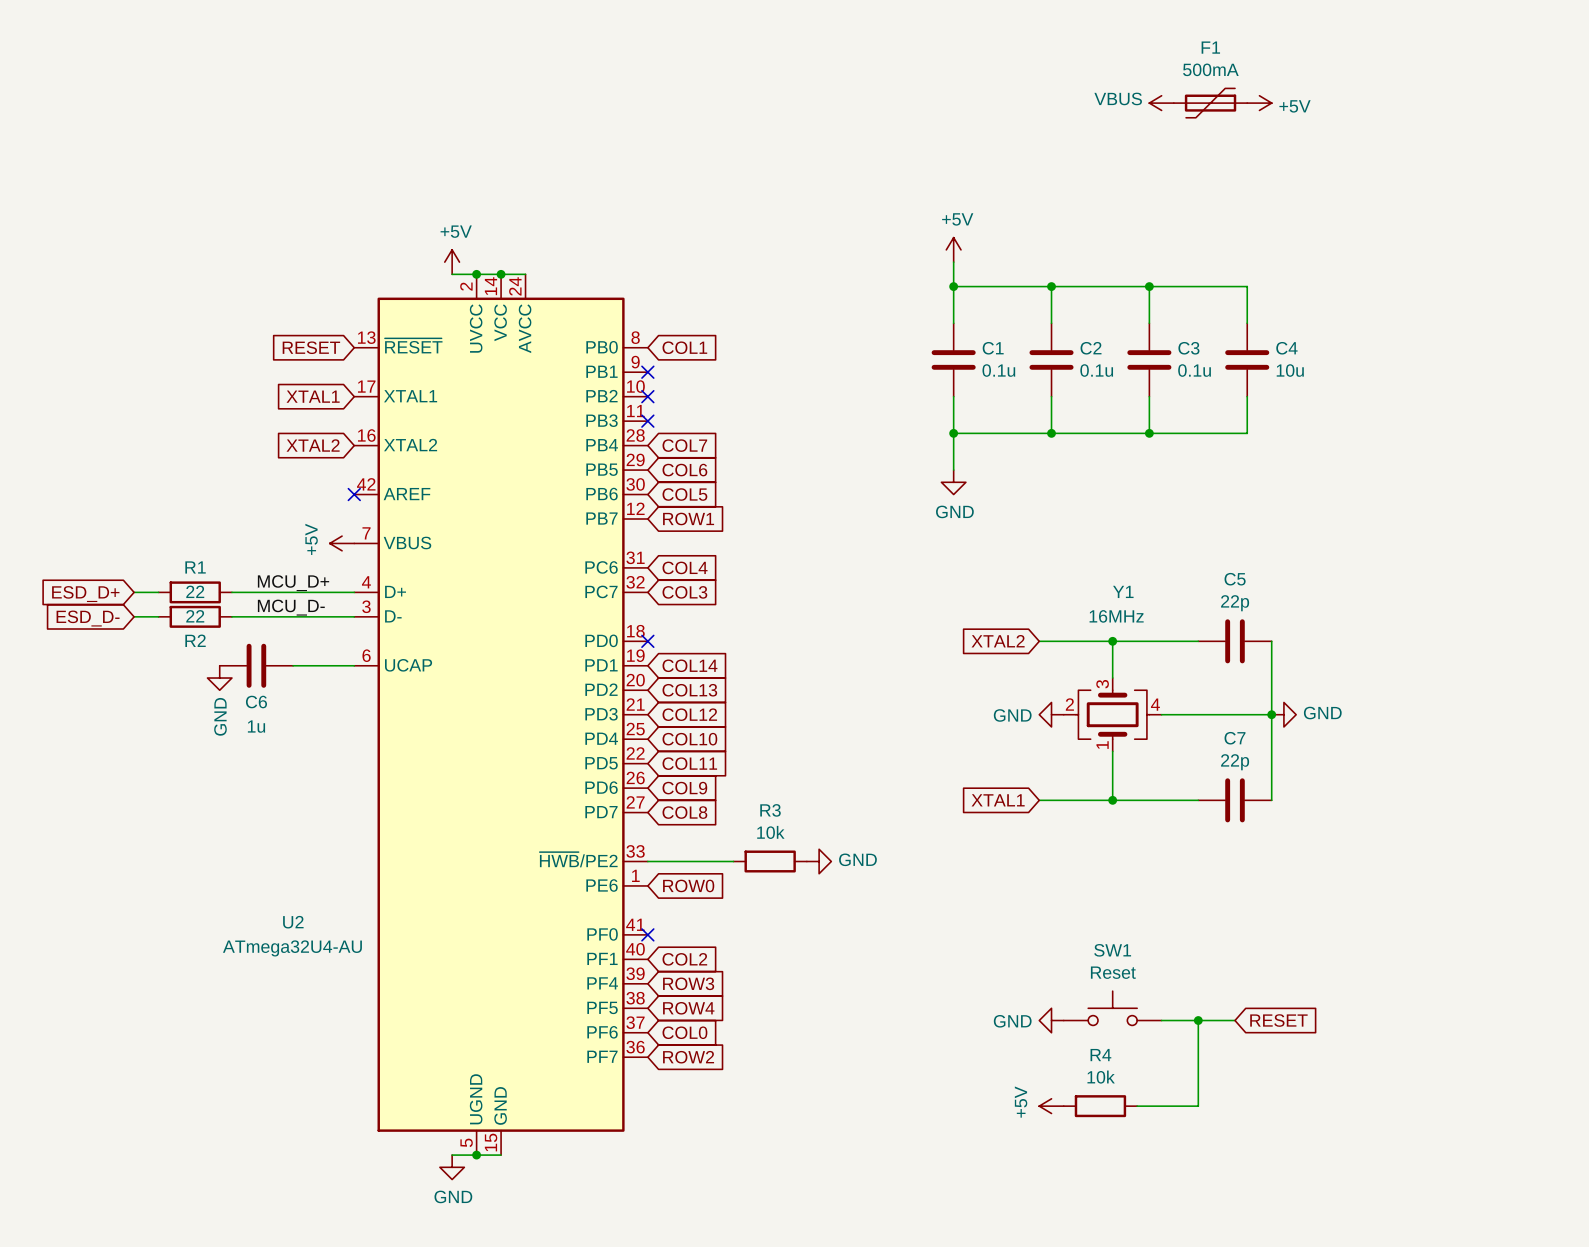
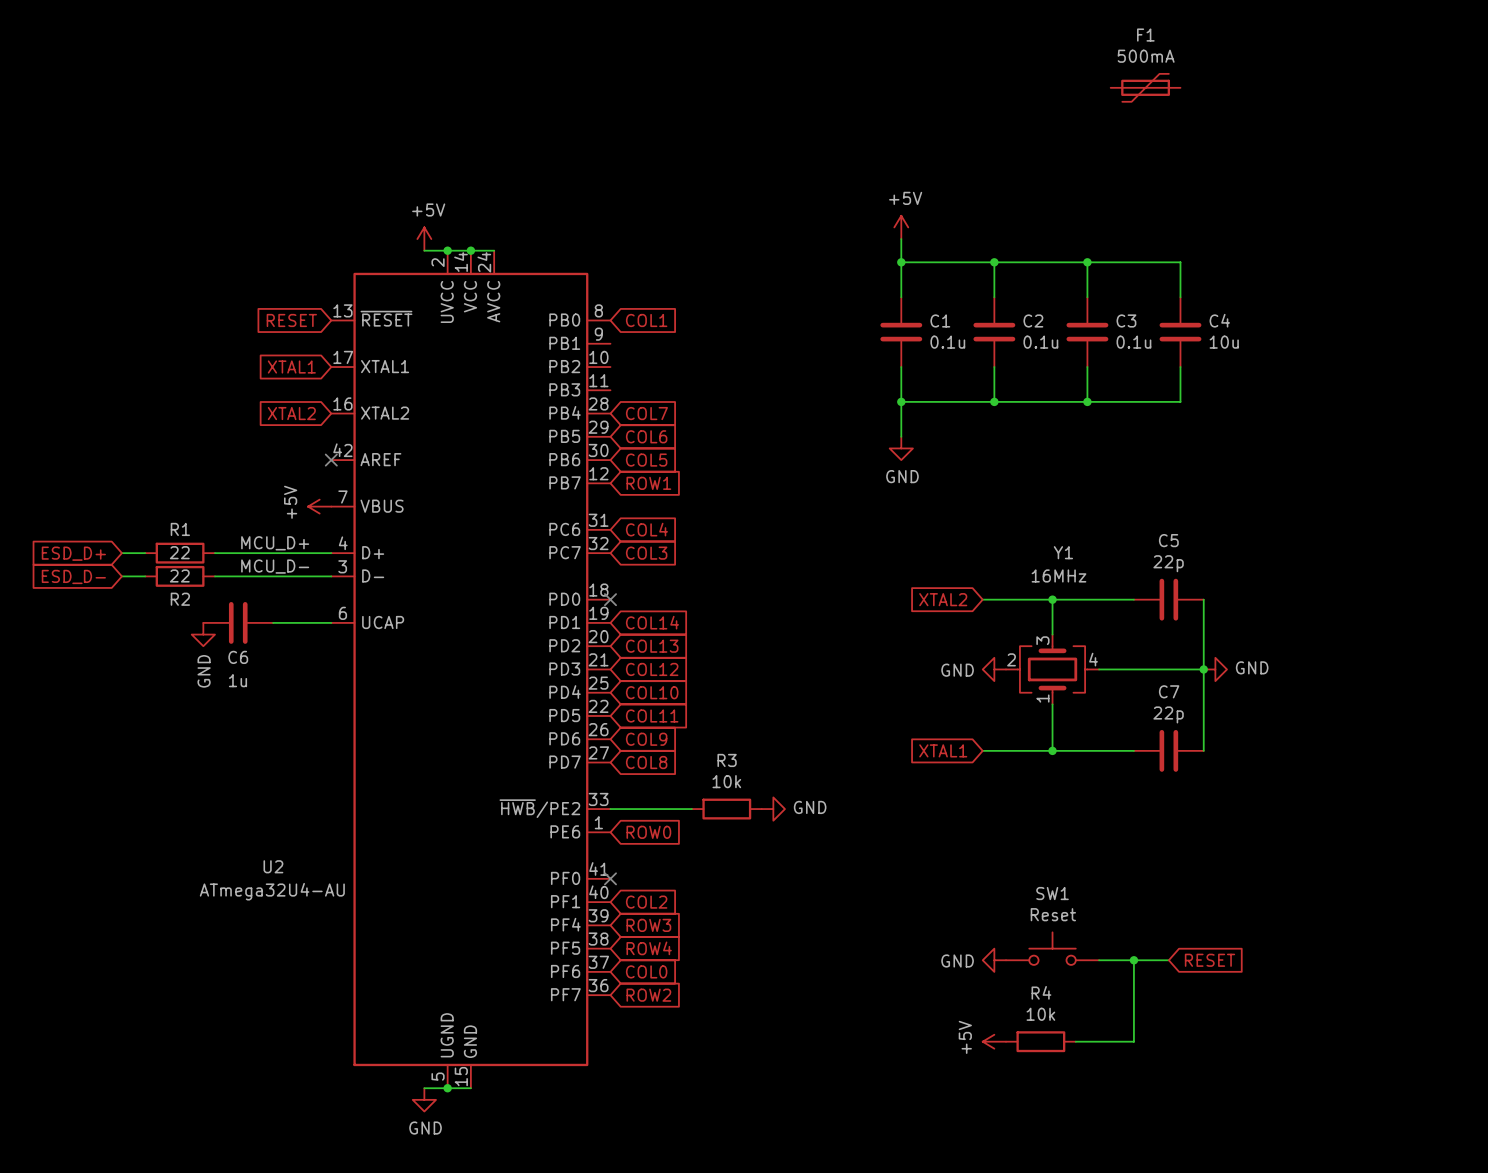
power symbol: VBUS (1161, 103) -> none
power symbol: +5V (1259, 103) -> none
no-connect mark: (647, 372) -> none
no-connect mark: (647, 396) -> none
no-connect mark: (647, 421) -> none

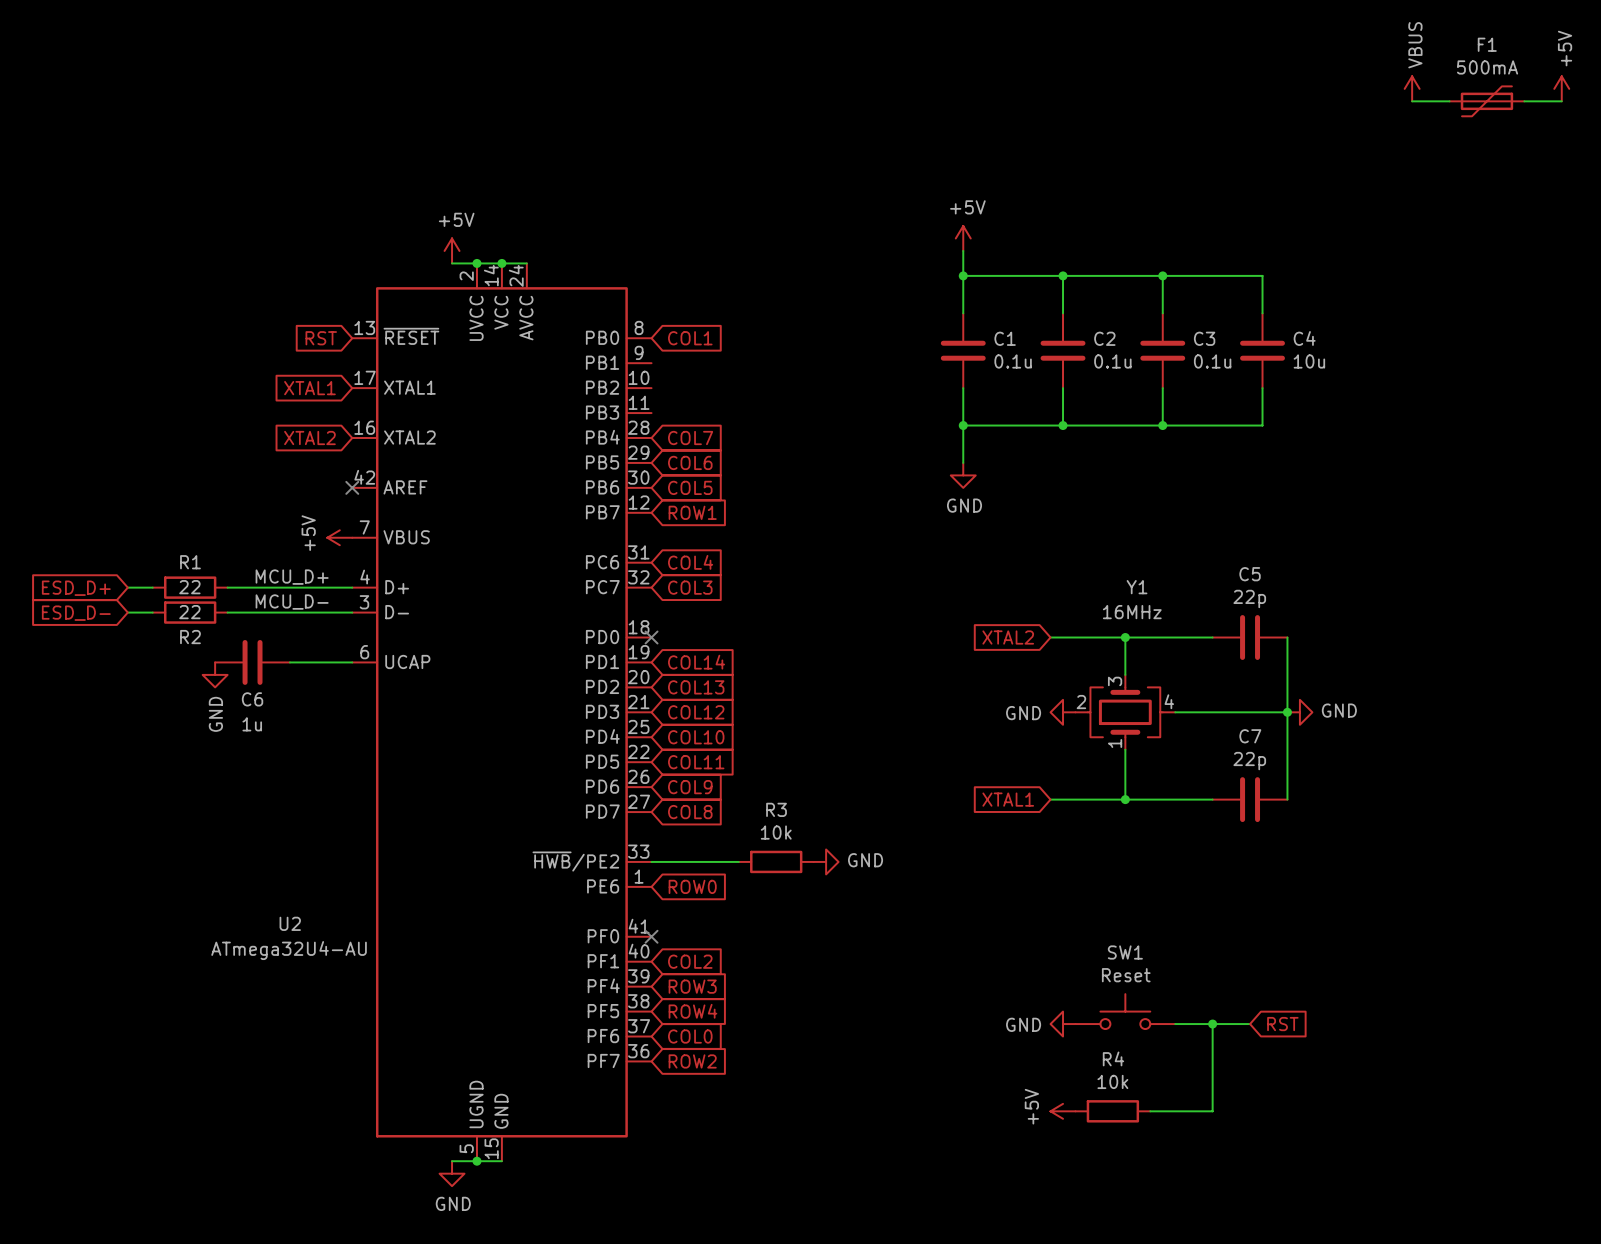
F1 position: (1145, 87) -> (1486, 101)
power symbol: none -> VBUS (1412, 88)
power symbol: none -> +5V (1561, 88)
wire: none -> (1412, 101) (1449, 101)
wire: none -> (1524, 101) (1561, 101)
global label: RESET (291, 320) -> RST (321, 338)
global label: RESET (1209, 960) -> RST (1282, 1024)

